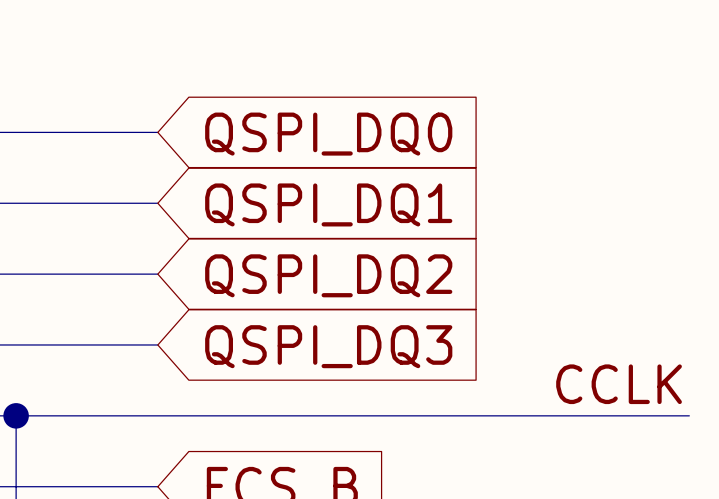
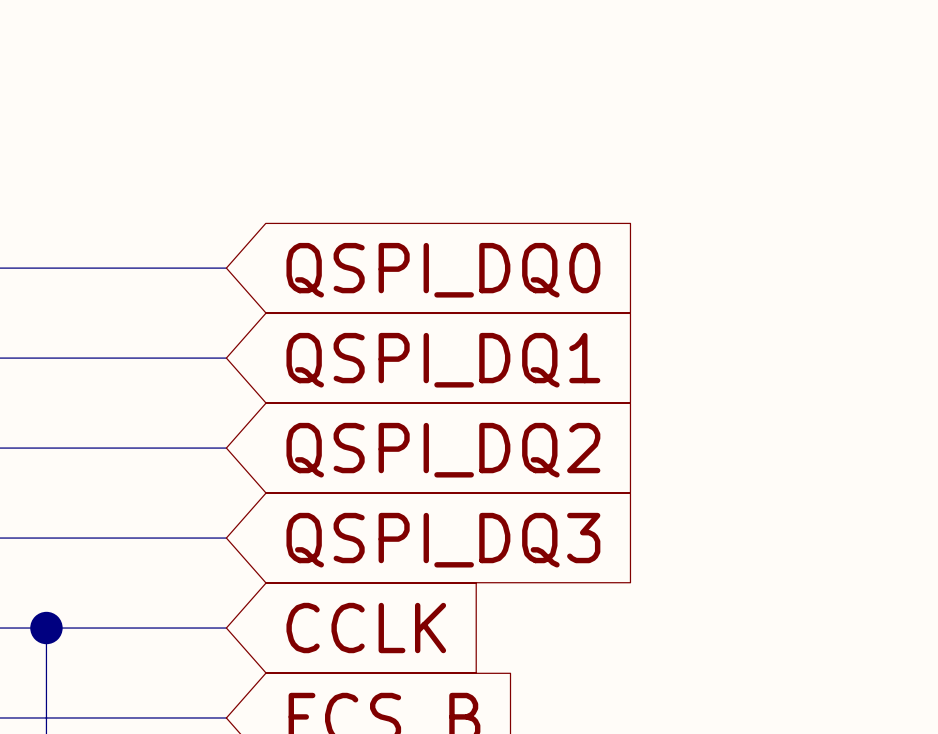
label: CCLK (619, 384) -> none
wire: (157, 415) (689, 415) -> none
global label: none -> CCLK (366, 628)

